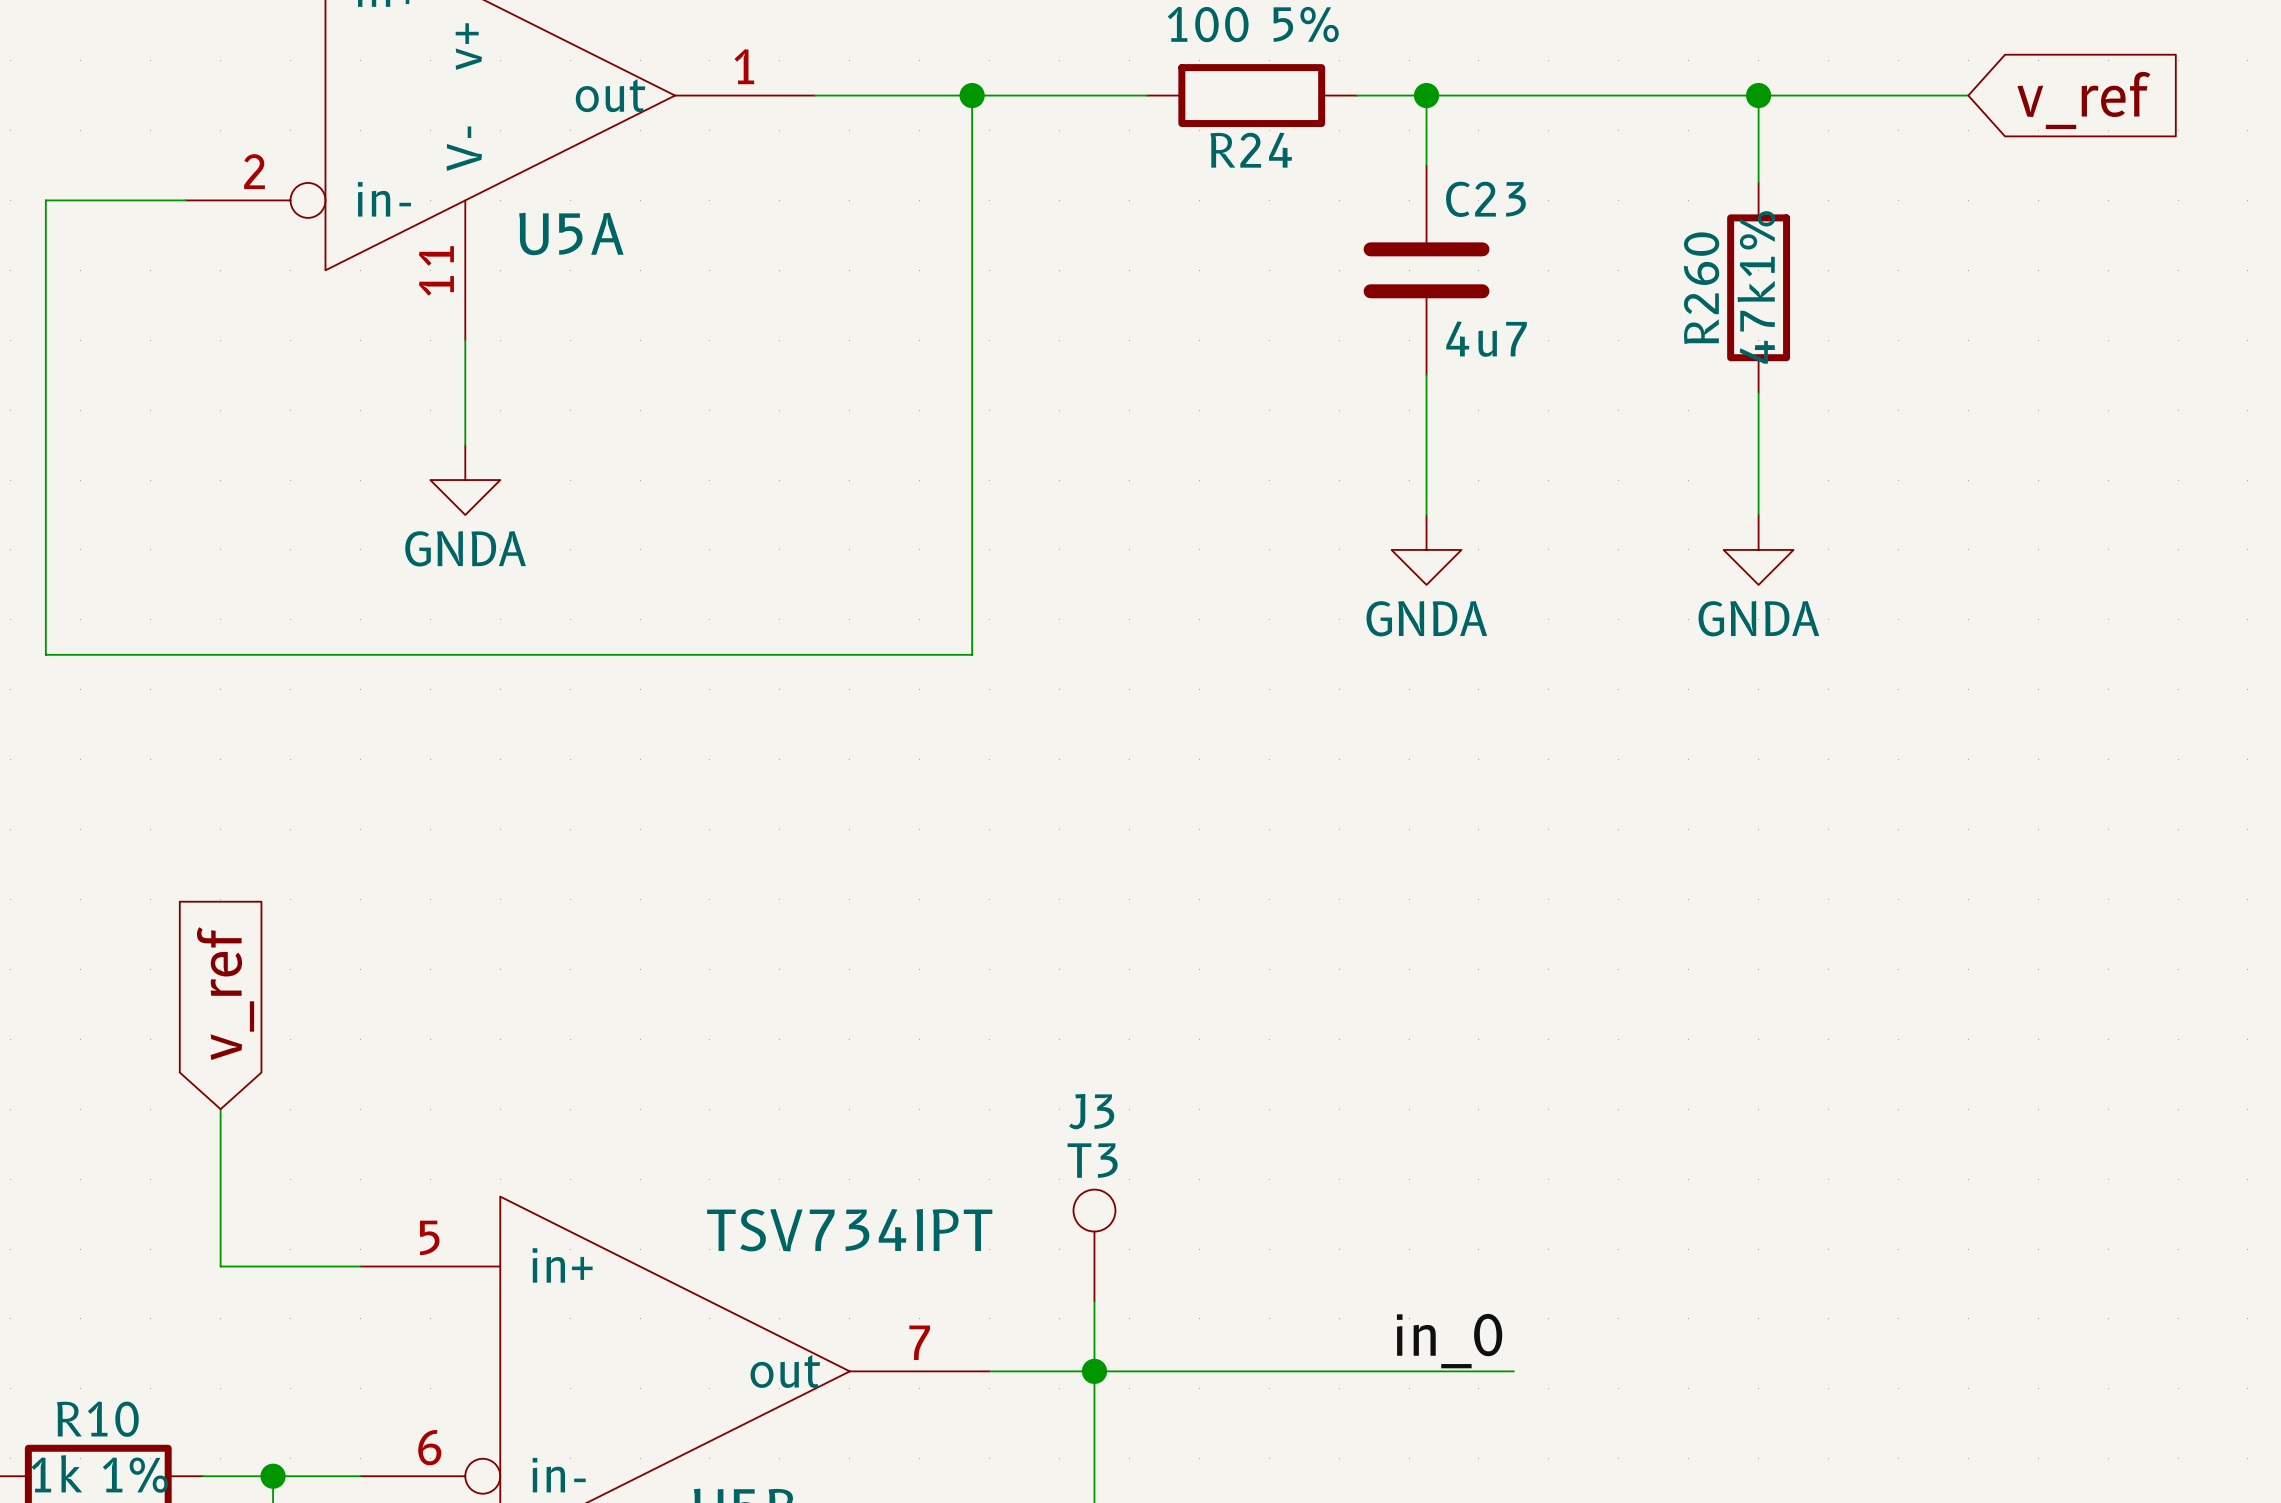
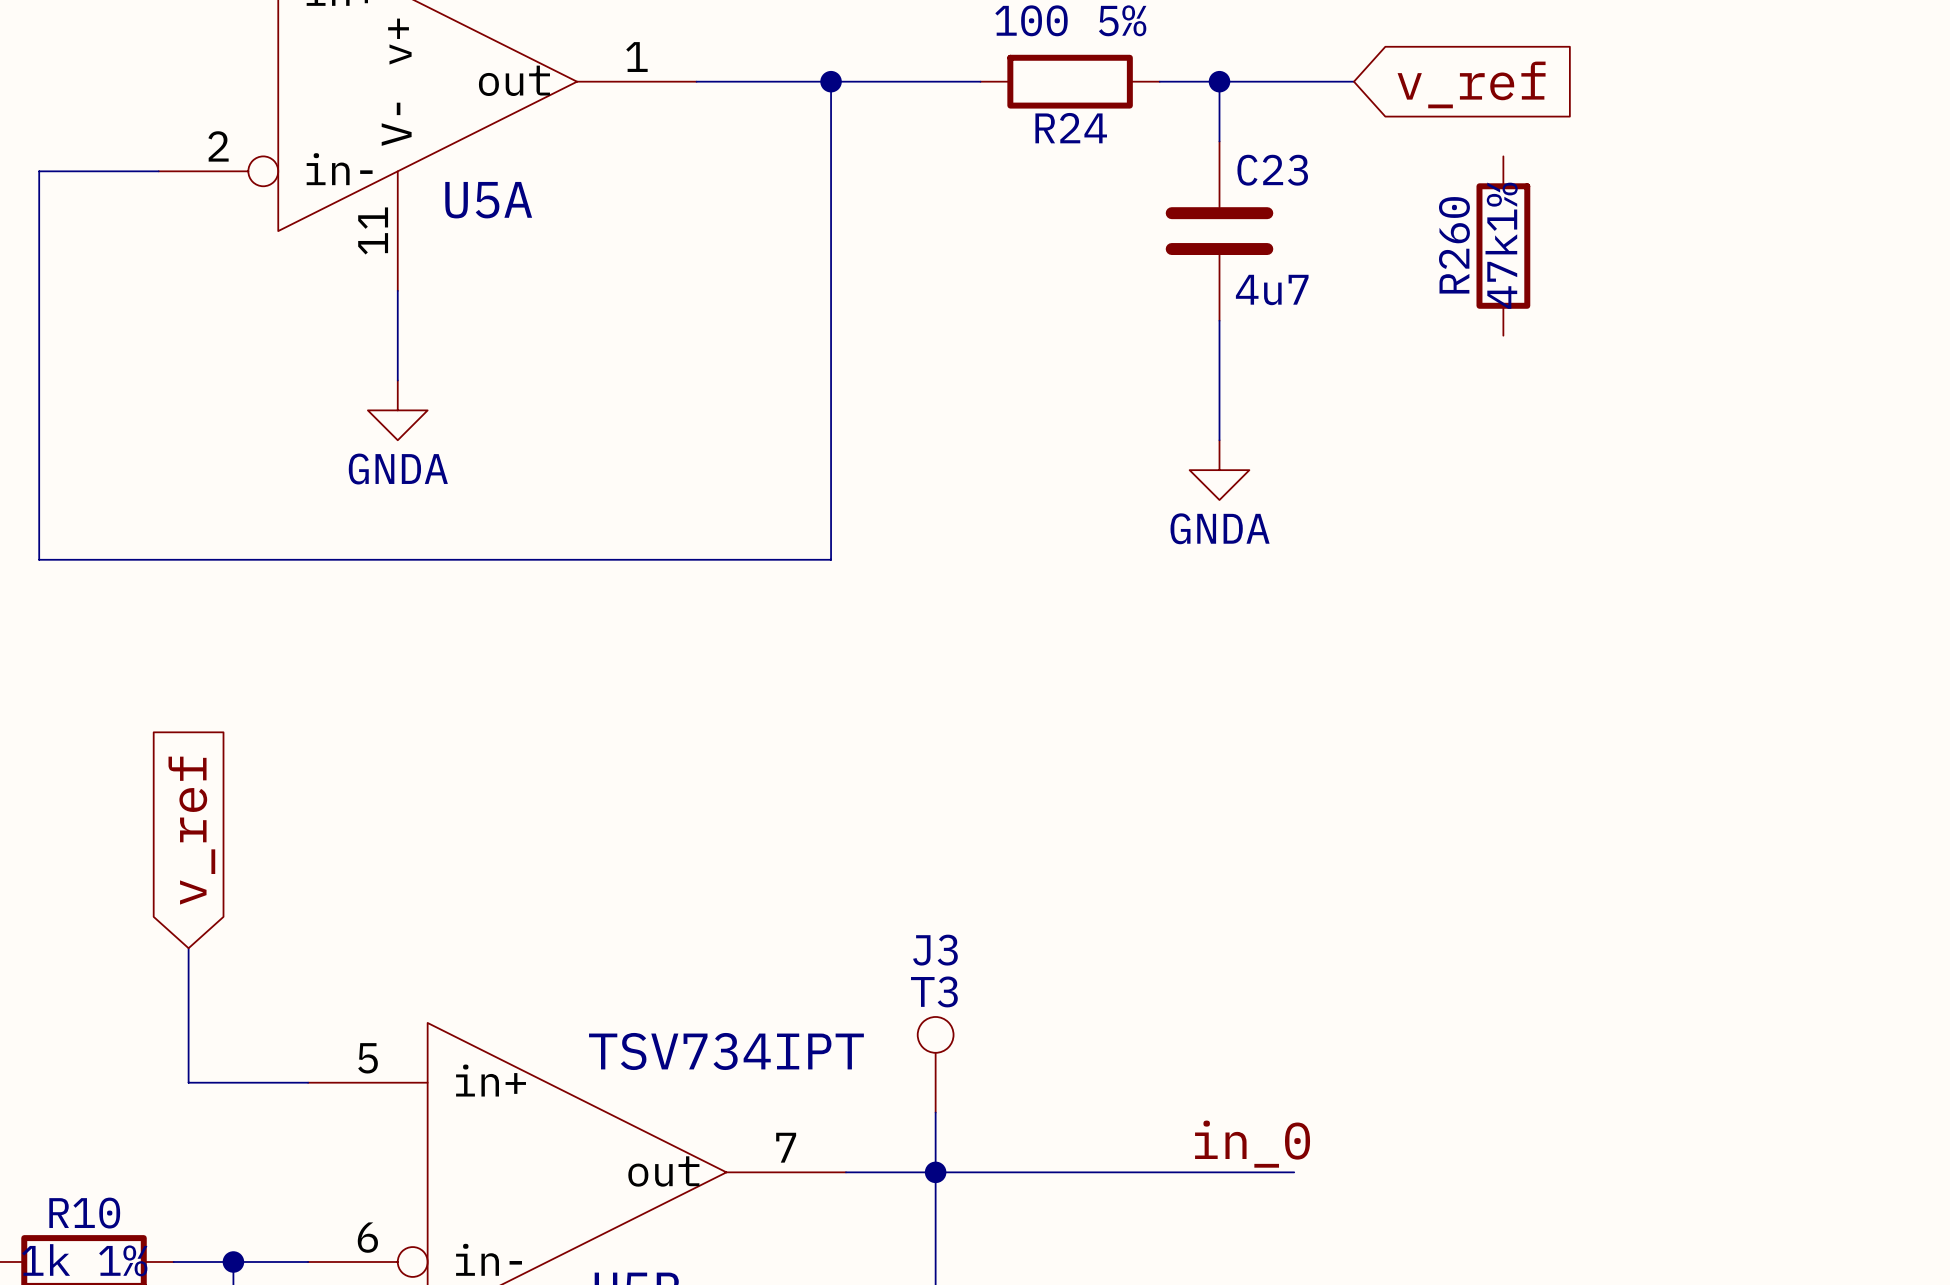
wire: (1583, 95) (1968, 95) -> none
wire: (1758, 95) (1758, 182) -> none
junction: (1758, 95) -> none
global label position: v_ref (2083, 100) -> v_ref (1471, 84)
wire: (1758, 392) (1758, 515) -> none
power symbol: GNDA (1758, 549) -> none

